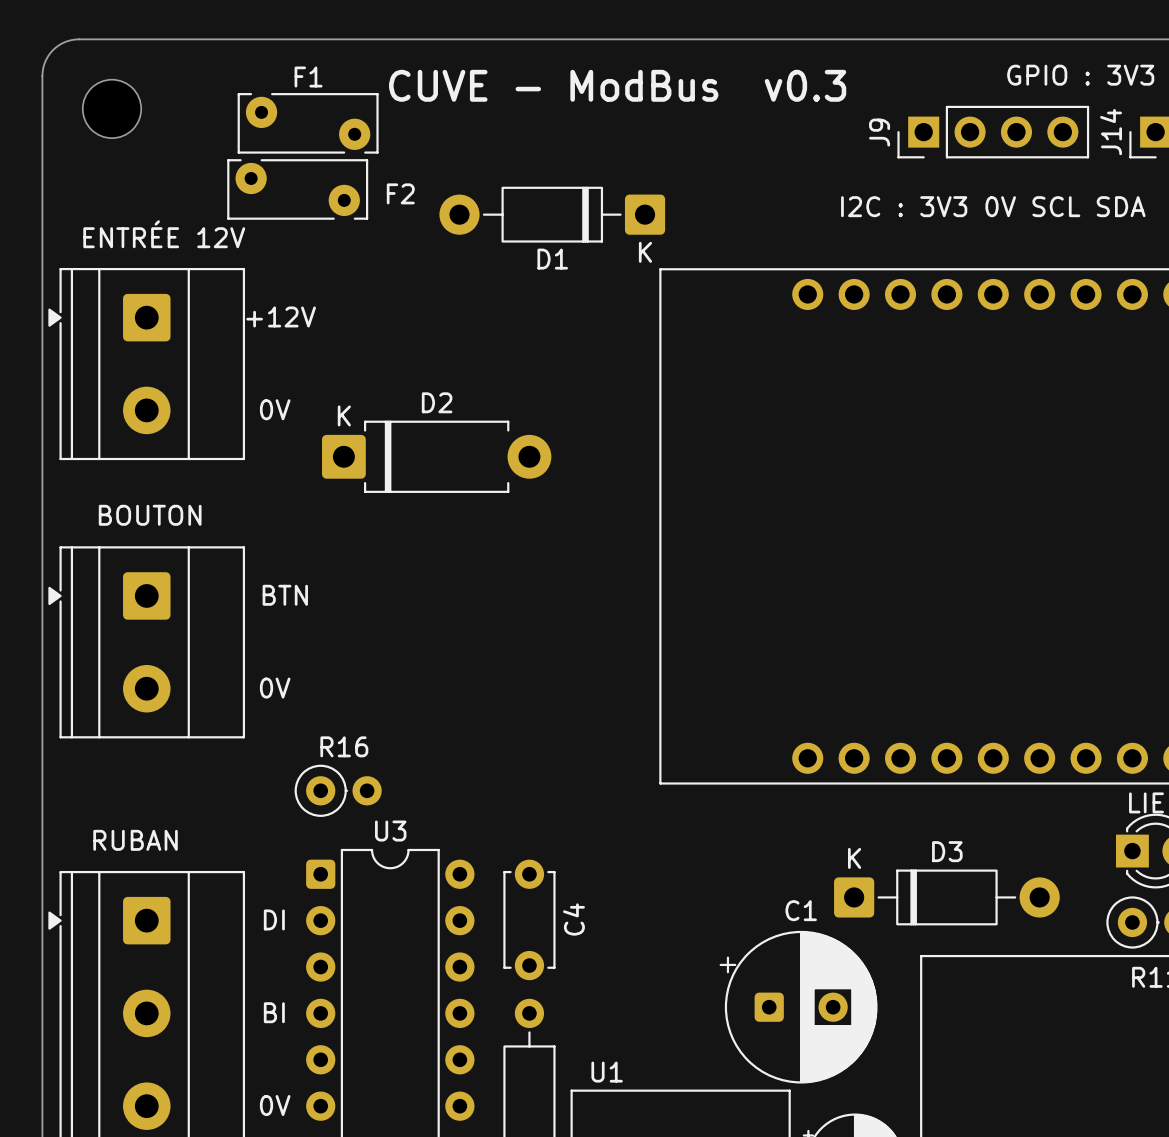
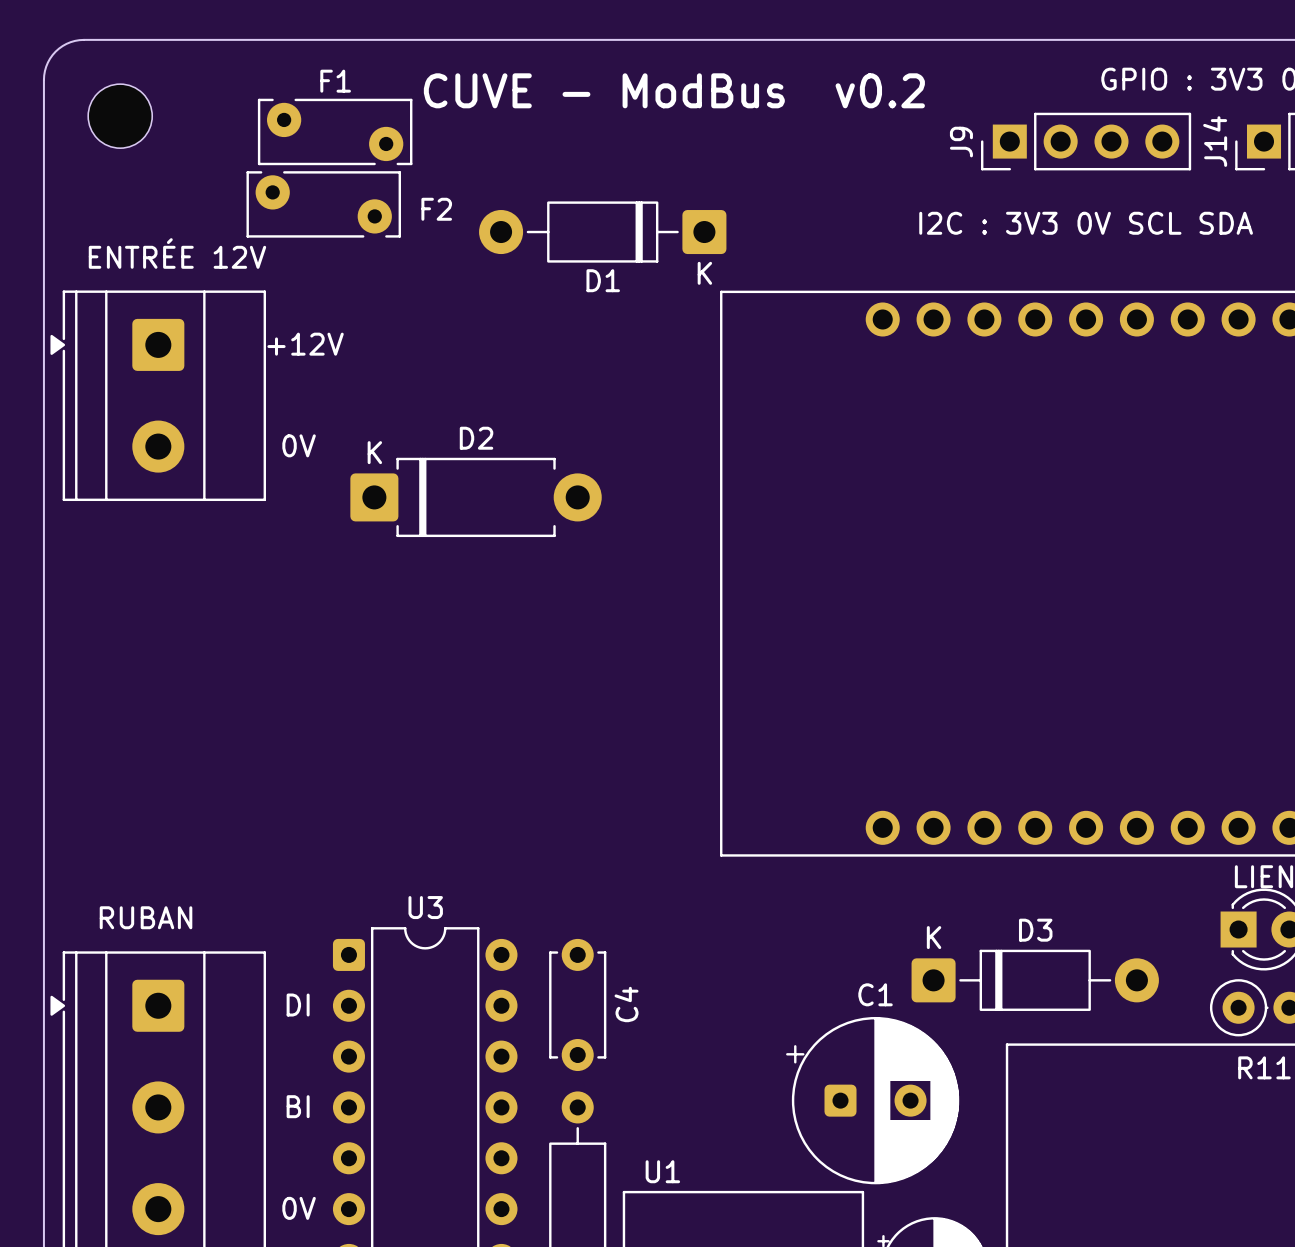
text: CUVE - ModBus v0.3 (617, 85) -> CUVE - ModBus v0.2 (674, 90)
text: BOUTON (150, 515) -> none
text: BTN (285, 595) -> none
part: (146, 642) -> none
text: 0V (275, 688) -> none
R16: (338, 790) -> none

